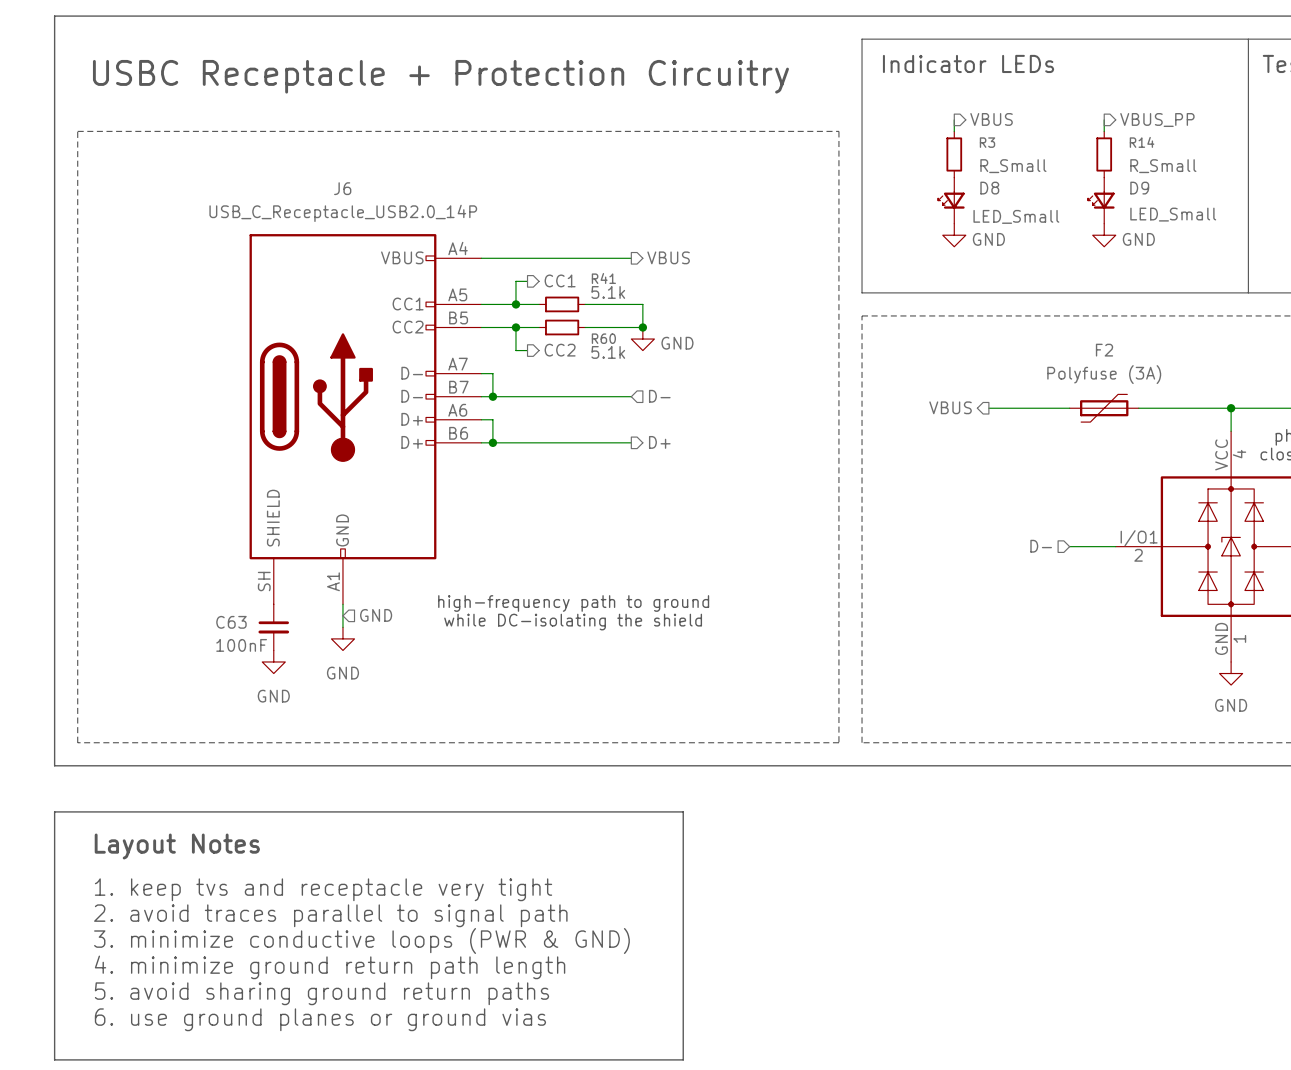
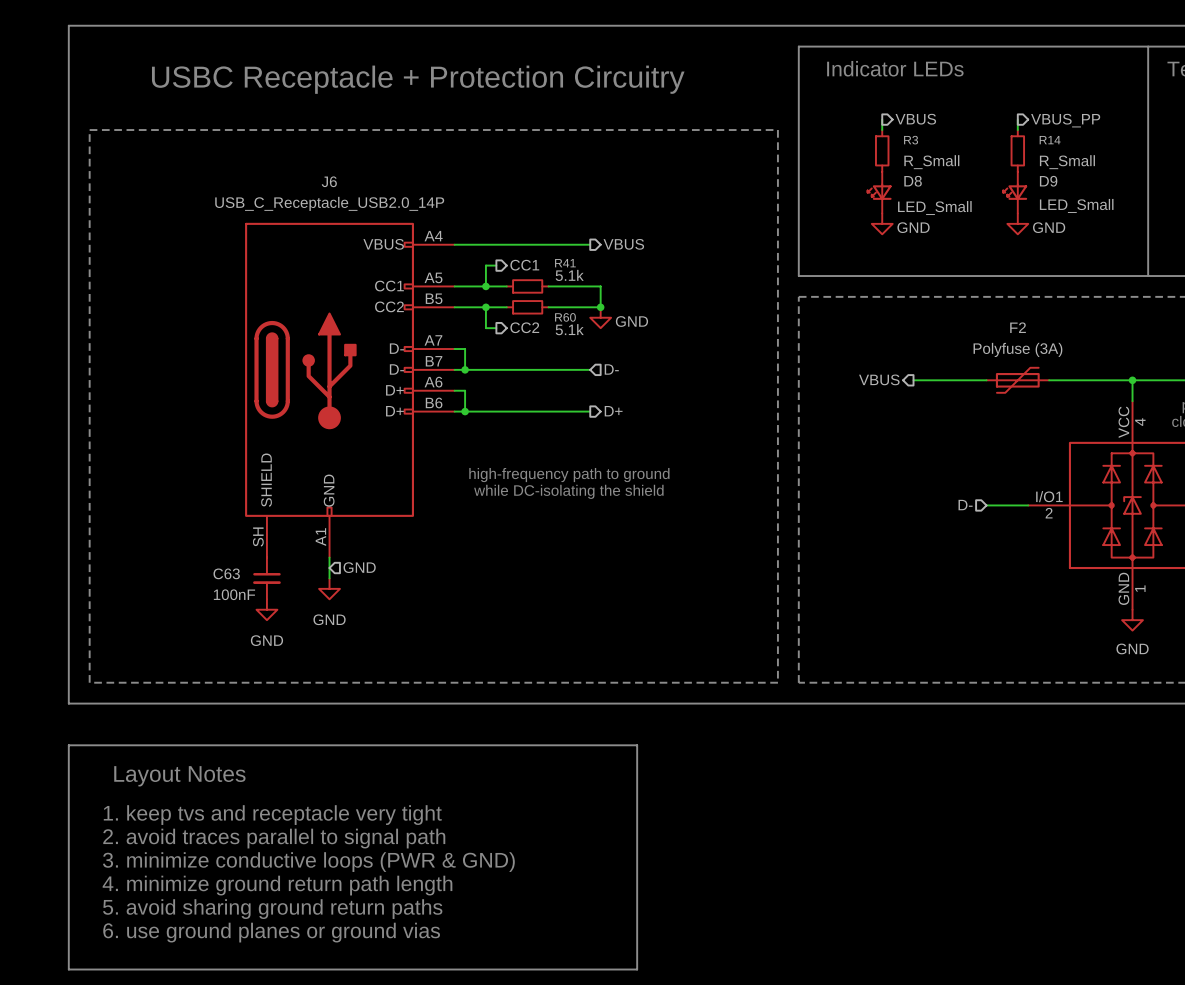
text position: high-frequency path to ground (573, 603) -> high-frequency path to ground (569, 475)
text position: while DC-isolating the shield (573, 622) -> while DC-isolating the shield (568, 491)

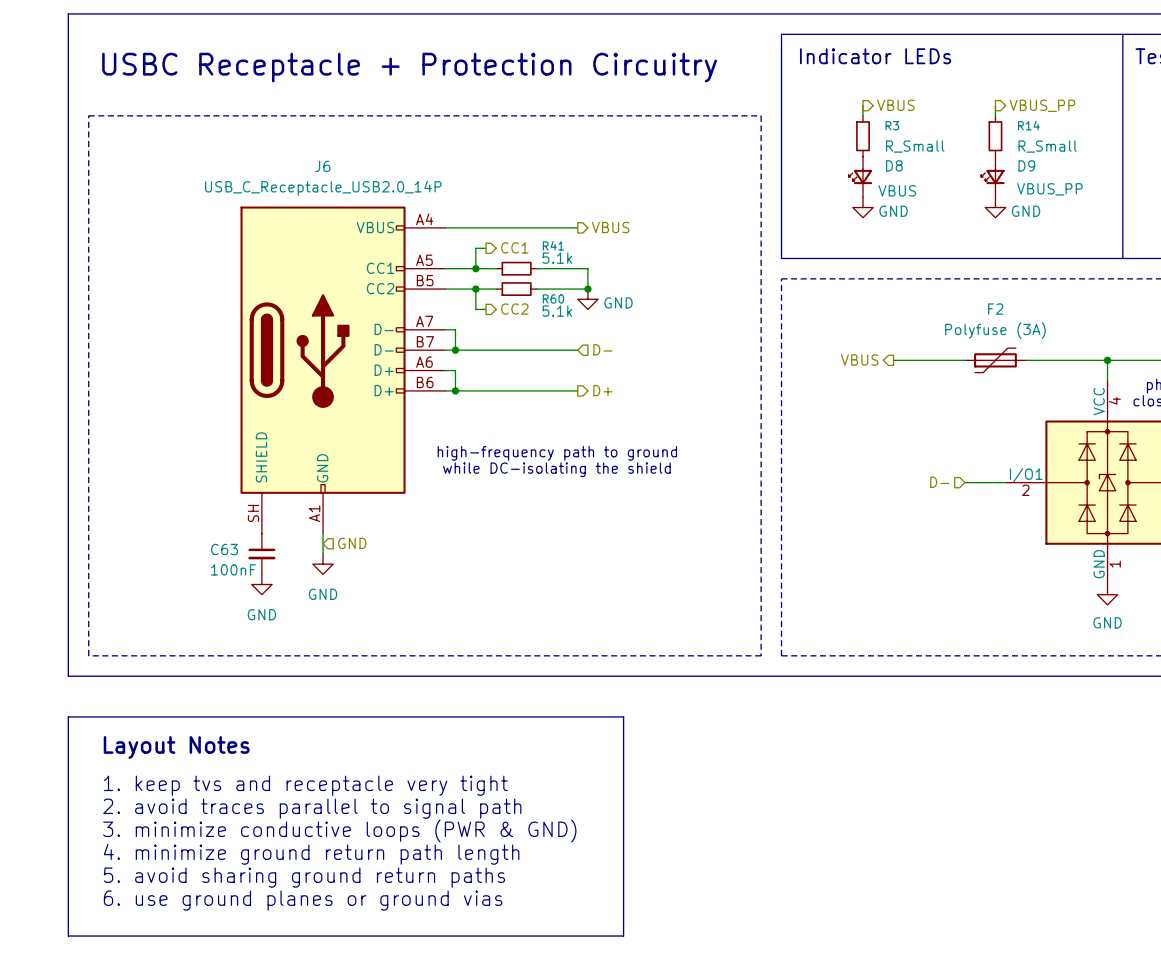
D9 value: LED_Small (1076, 205) -> VBUS_PP (1049, 189)
D8 value: LED_Small (934, 208) -> VBUS (897, 190)

